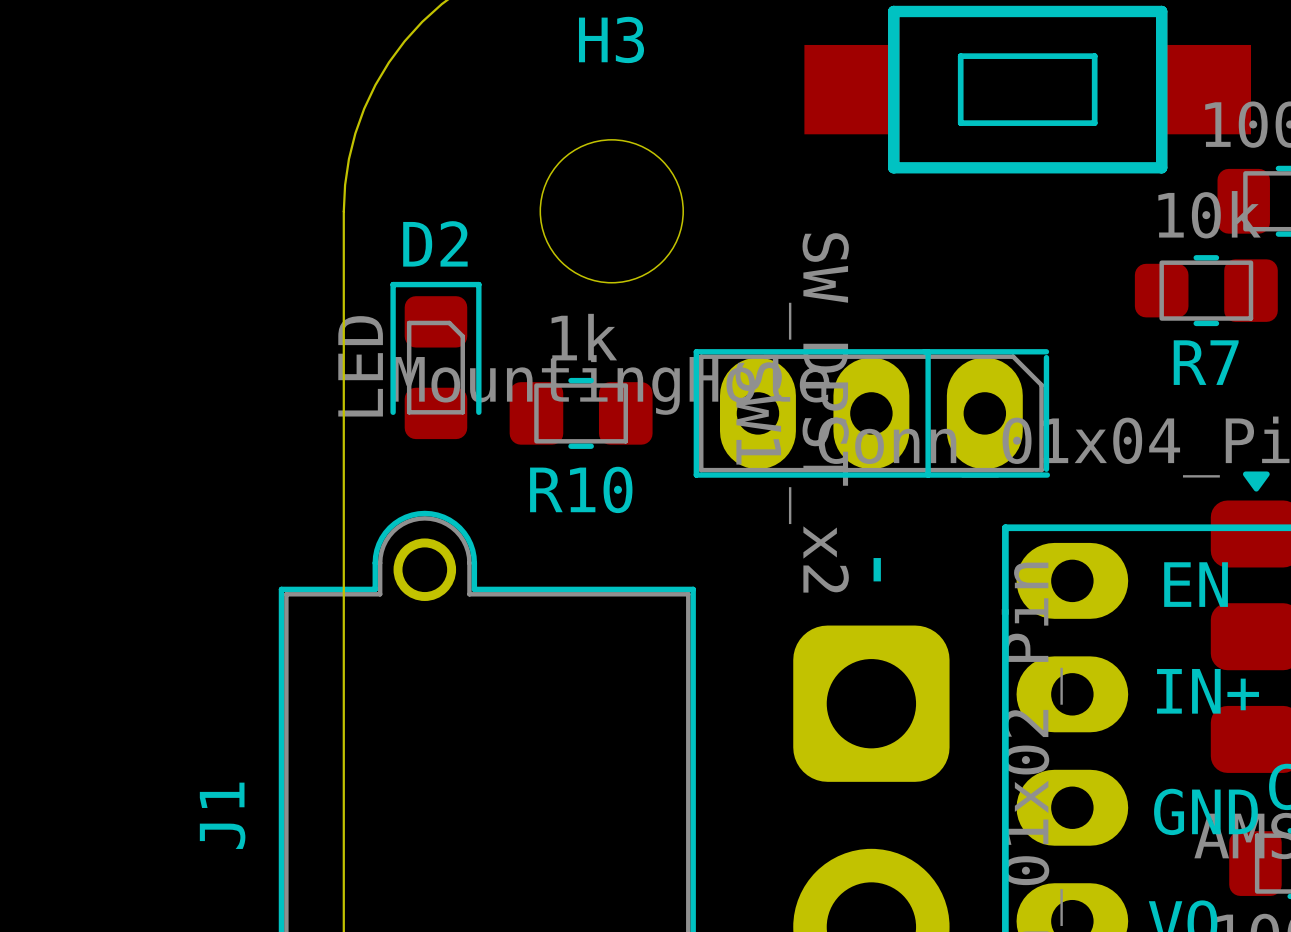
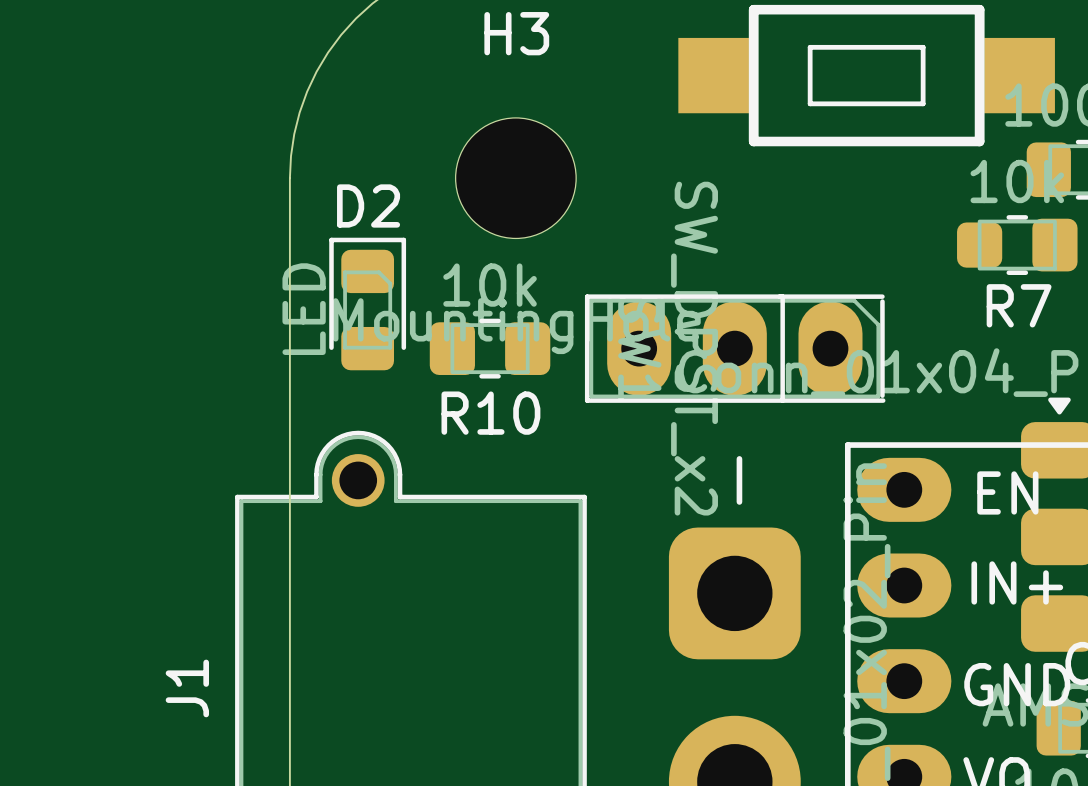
R10 value: 1k (584, 337) -> 10k (490, 285)

